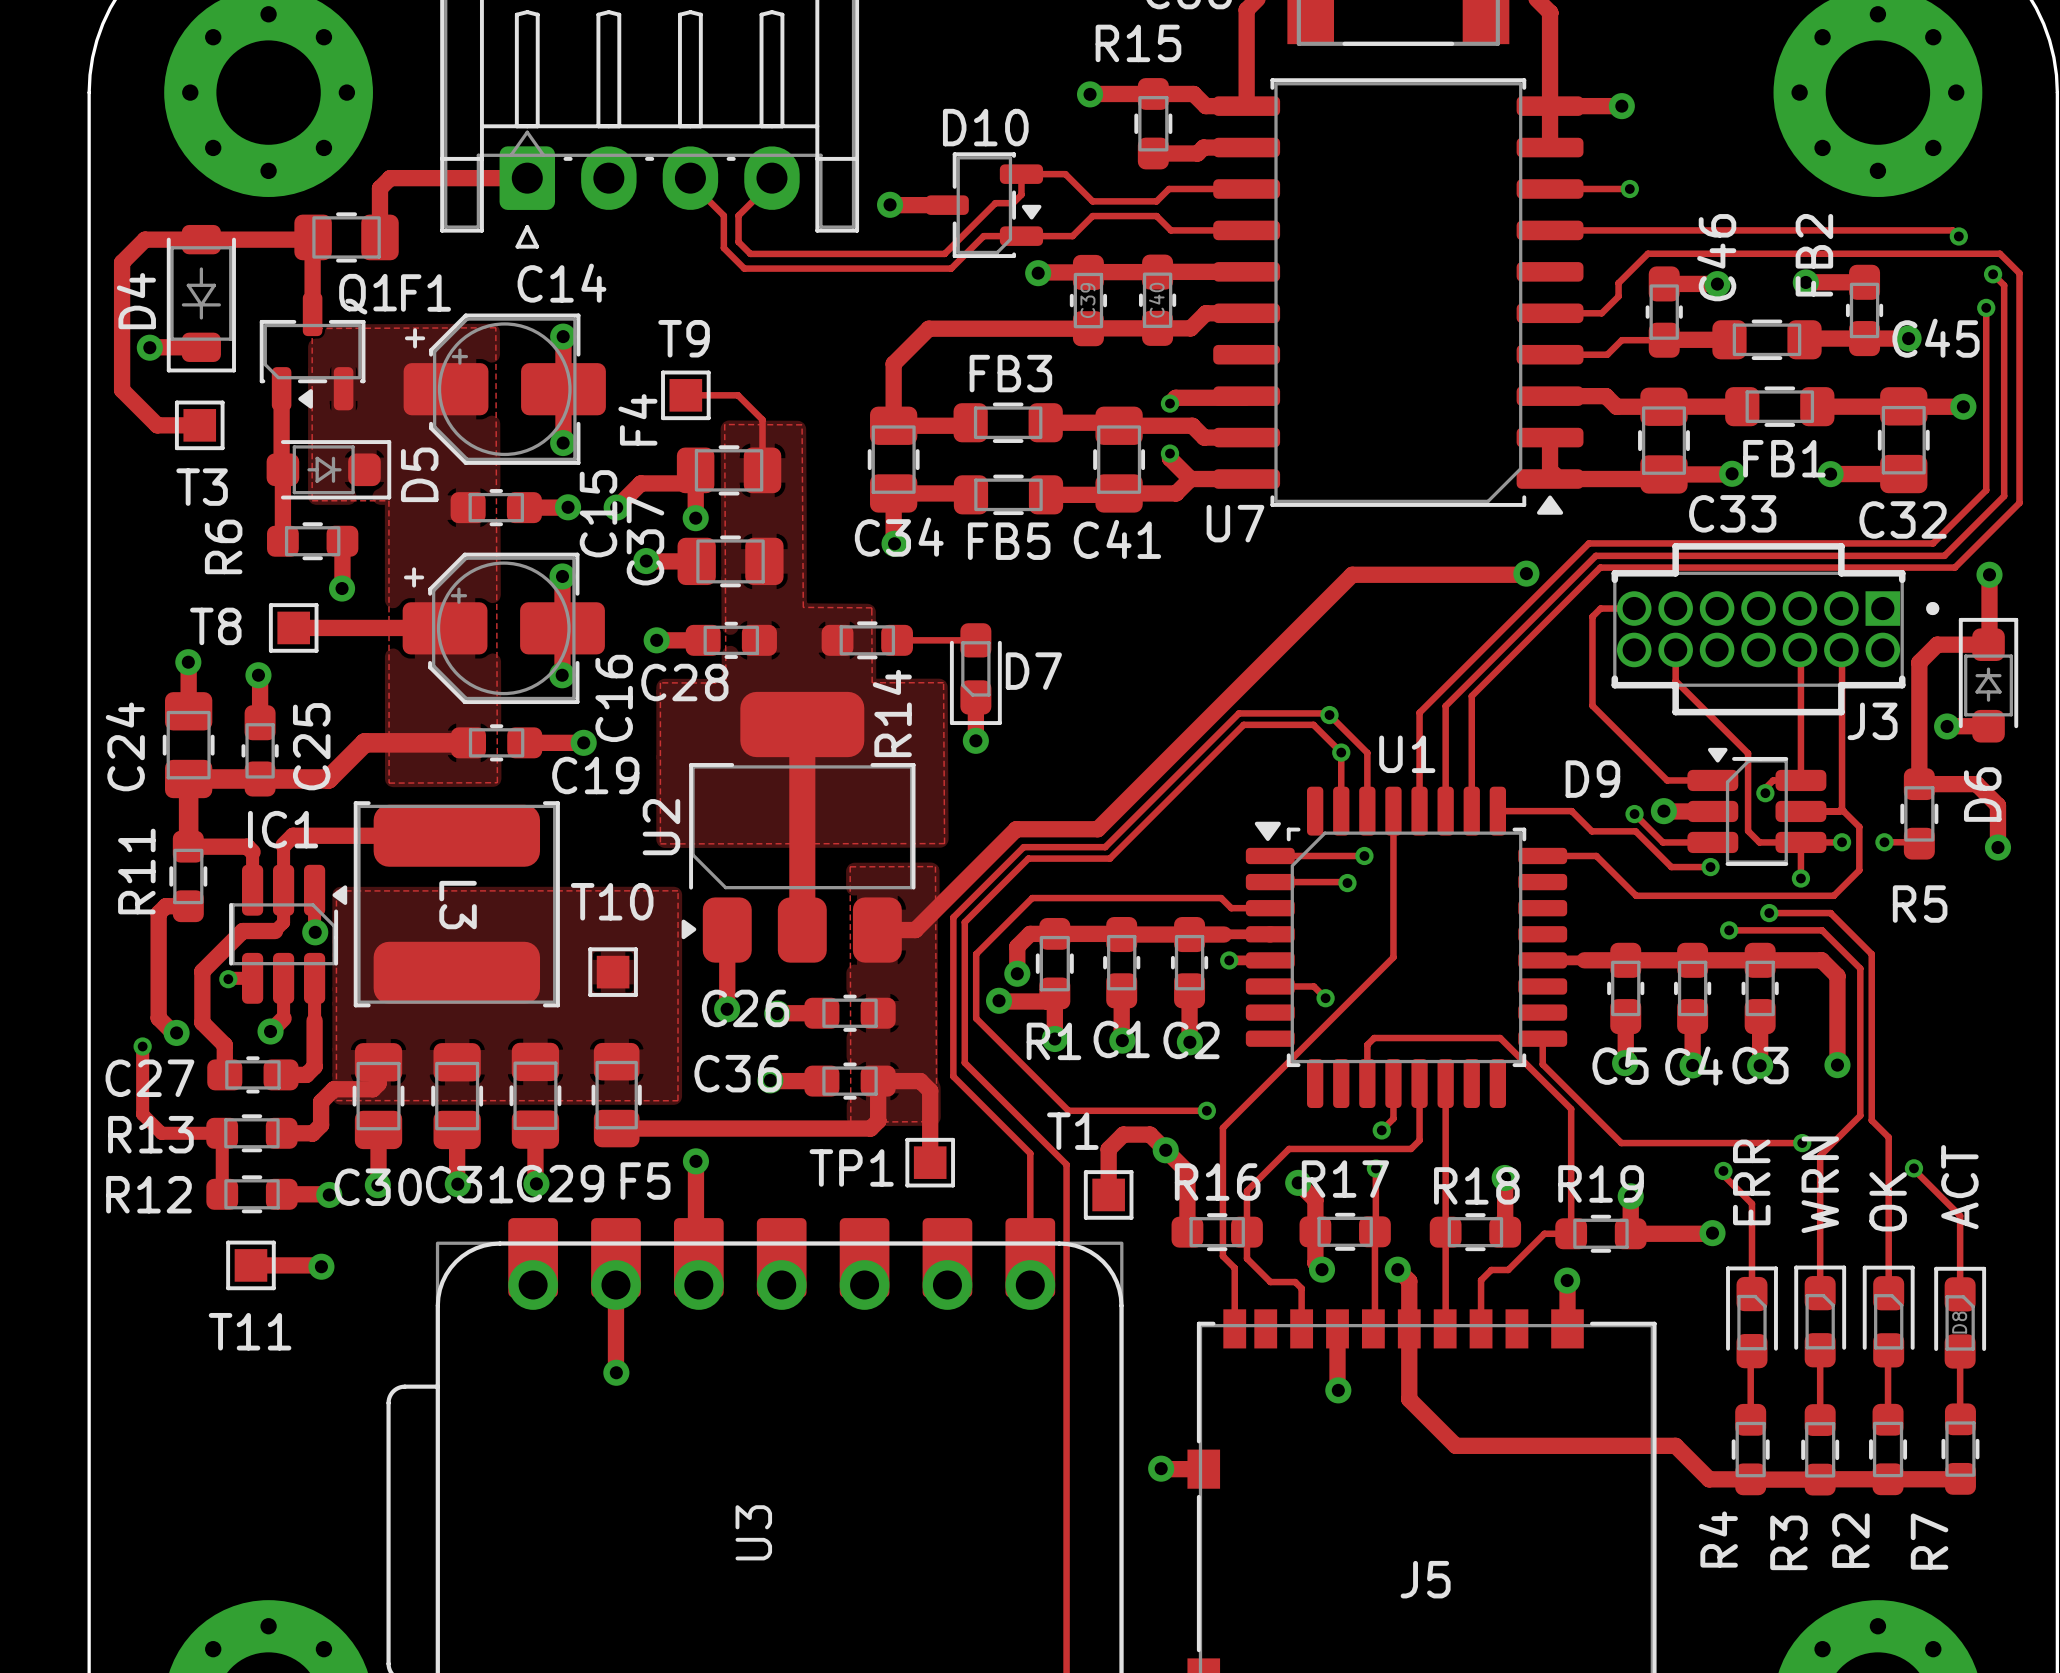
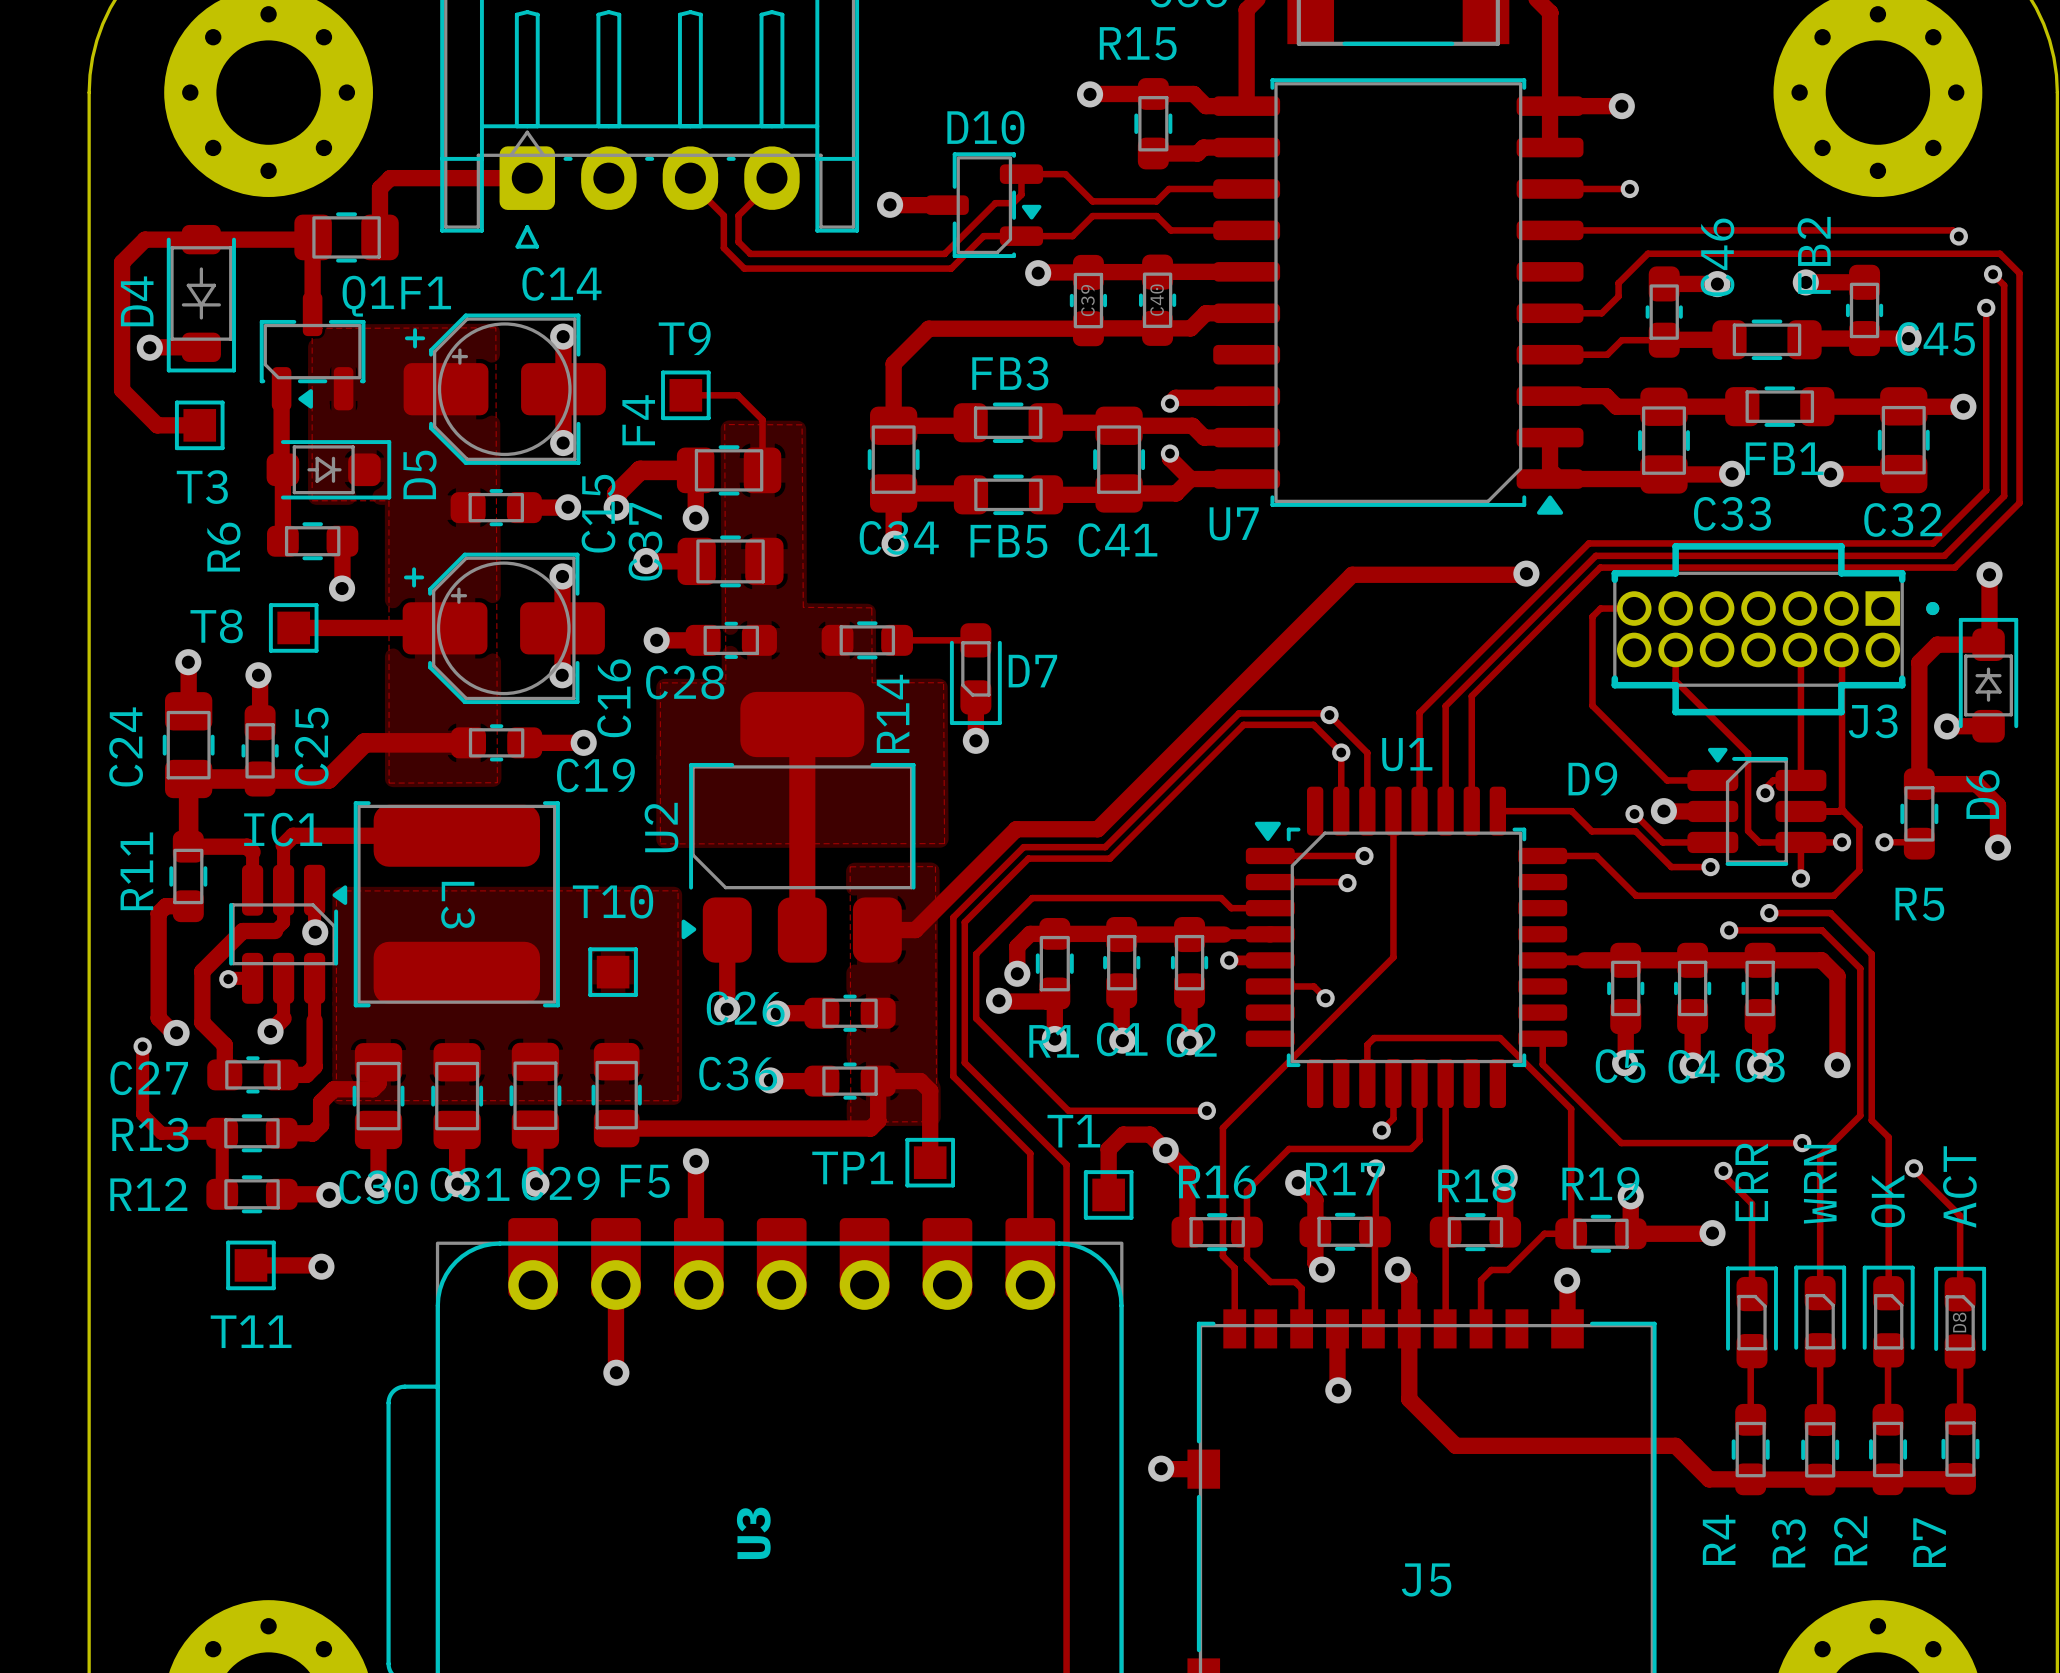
track: (699, 483) (640, 483) (616, 507) -> (695, 470) (640, 470) (616, 493) (616, 507)

